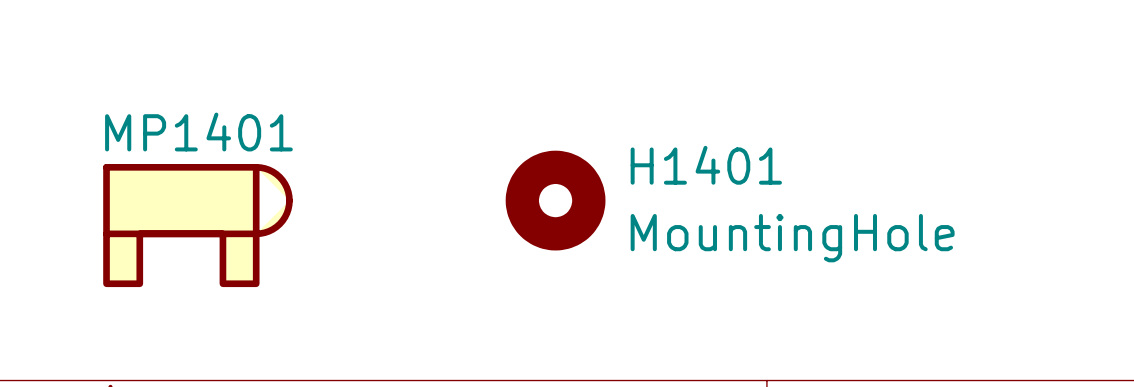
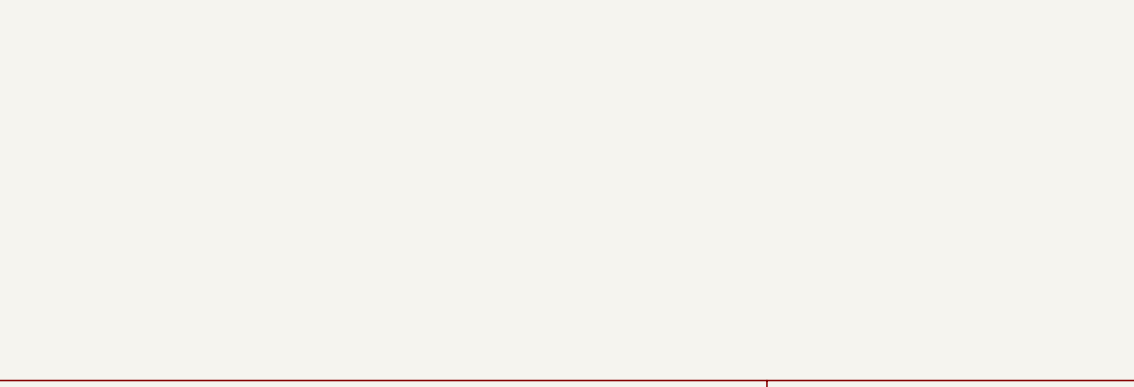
H1401: MountingHole (555, 200) -> none
MP1401: (197, 225) -> none

